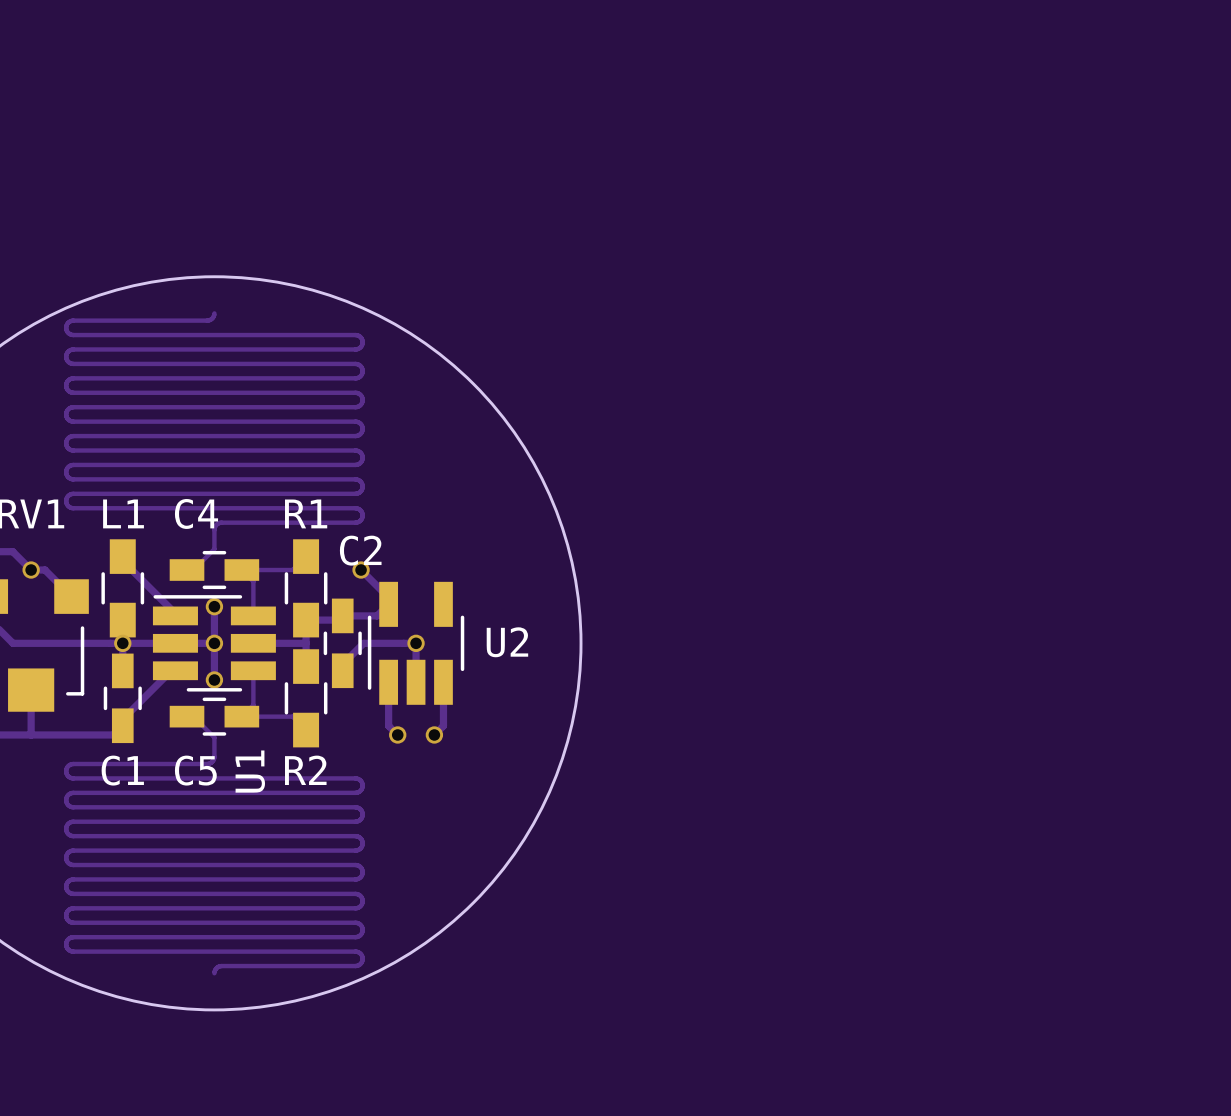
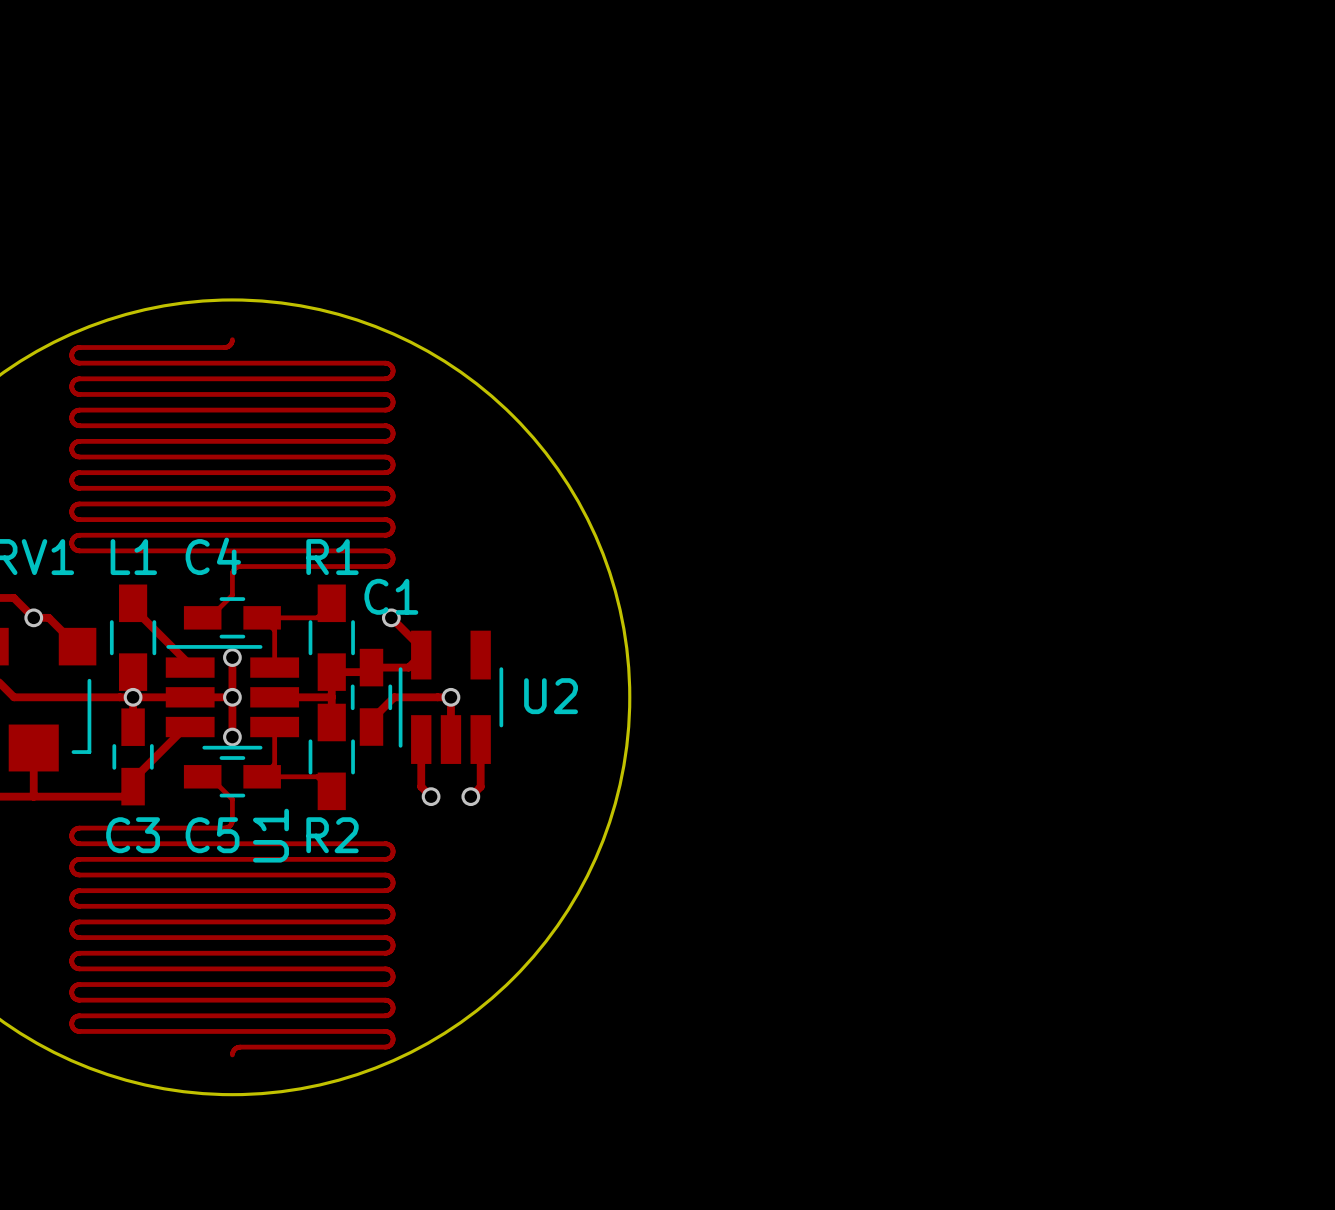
C2 name: C2 (360, 550) -> C1 (391, 596)
C1 name: C1 (122, 770) -> C3 (133, 835)

